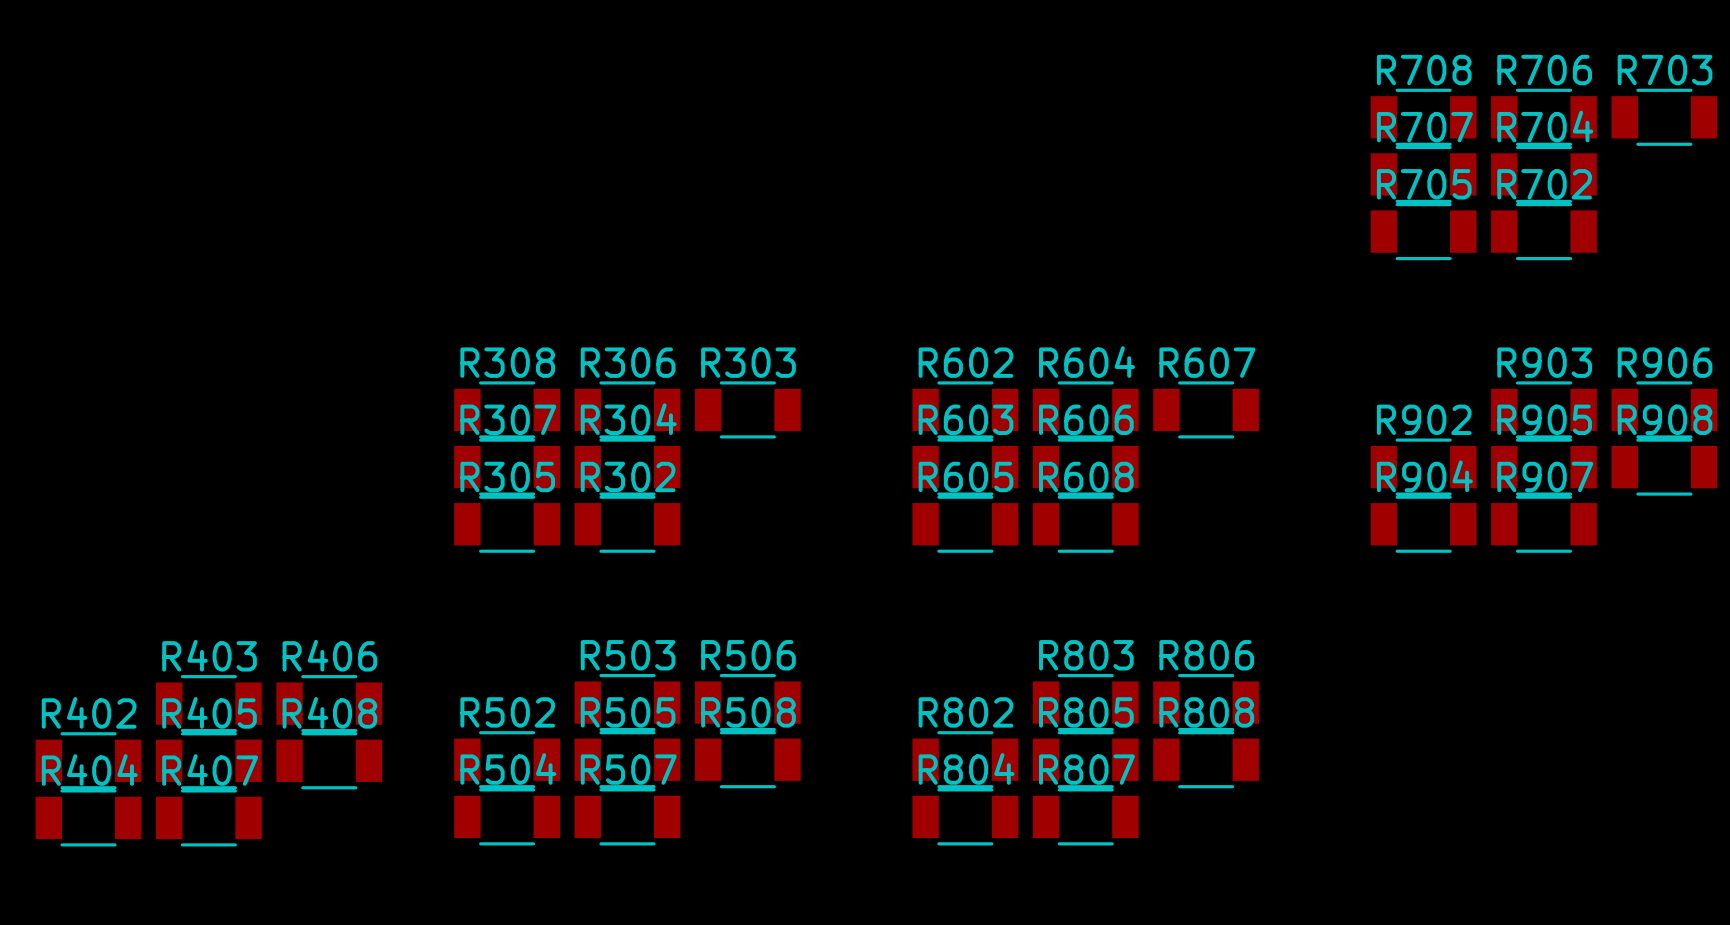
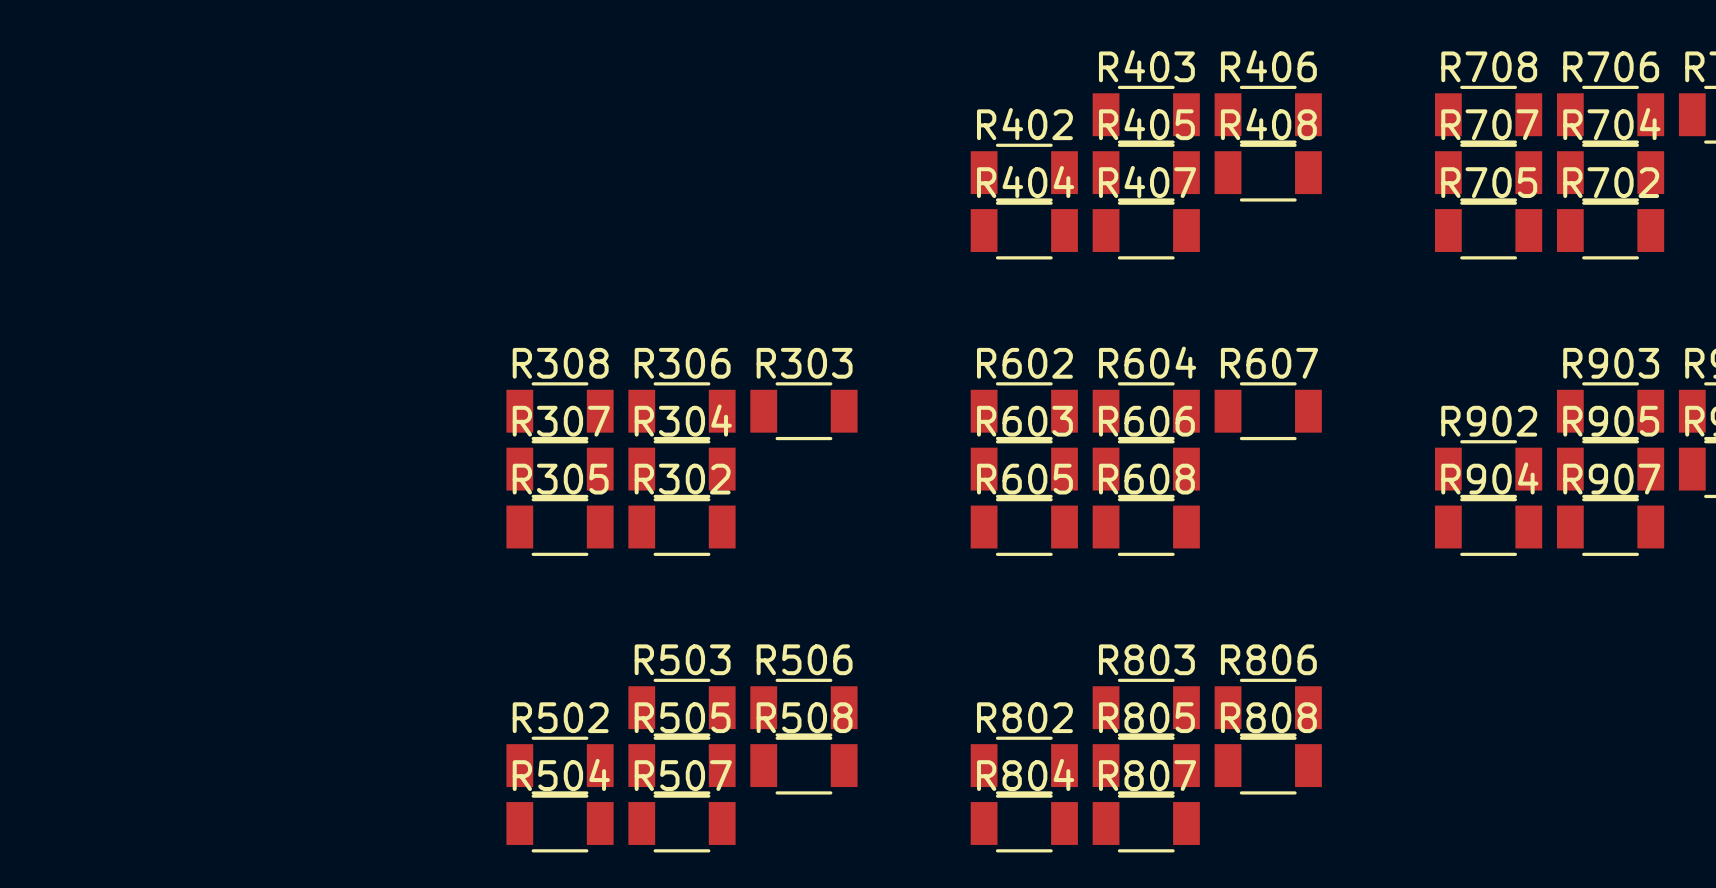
R403 position: (208, 703) -> (1146, 114)
R406 position: (329, 703) -> (1268, 114)
R402 position: (88, 760) -> (1024, 172)
R405 position: (208, 760) -> (1146, 172)
R408 position: (329, 760) -> (1268, 172)
R404 position: (88, 817) -> (1024, 230)
R407 position: (208, 817) -> (1146, 230)

